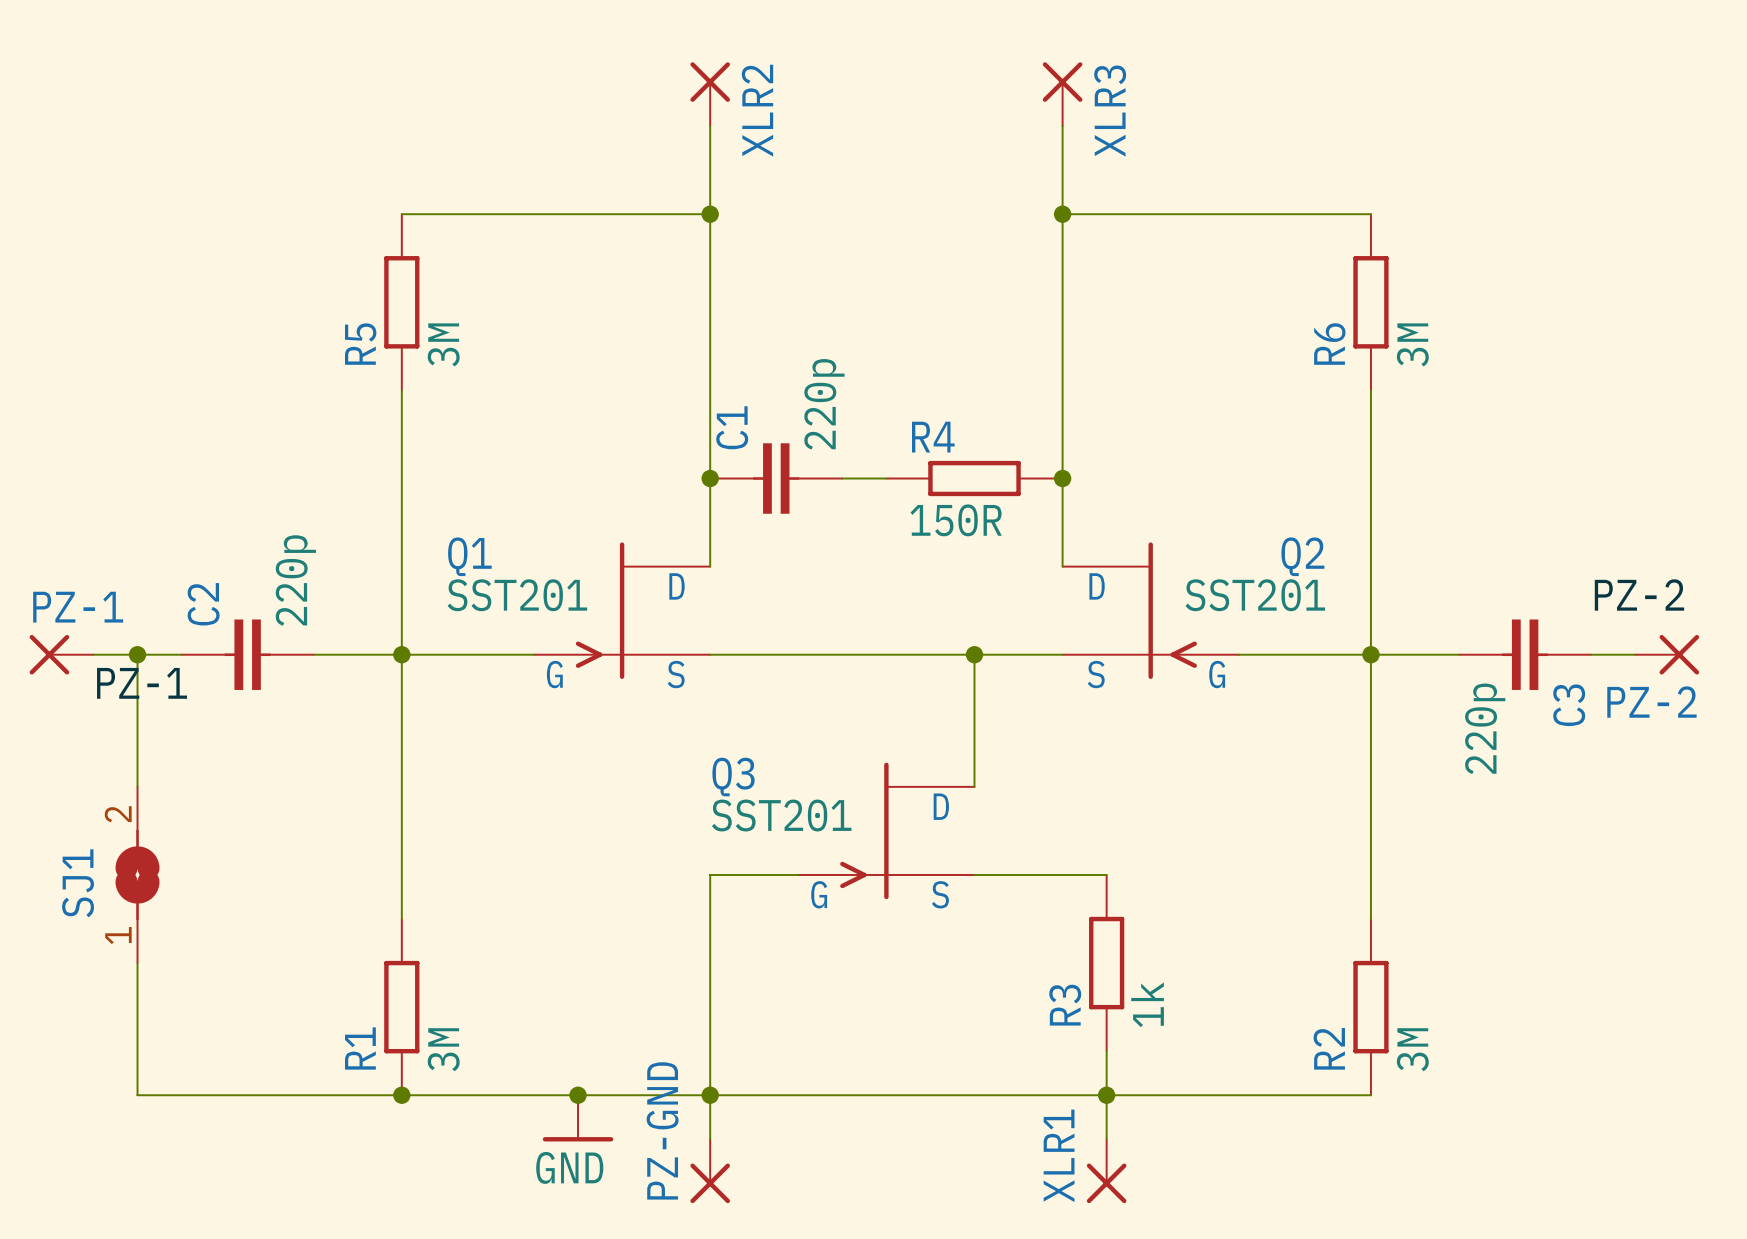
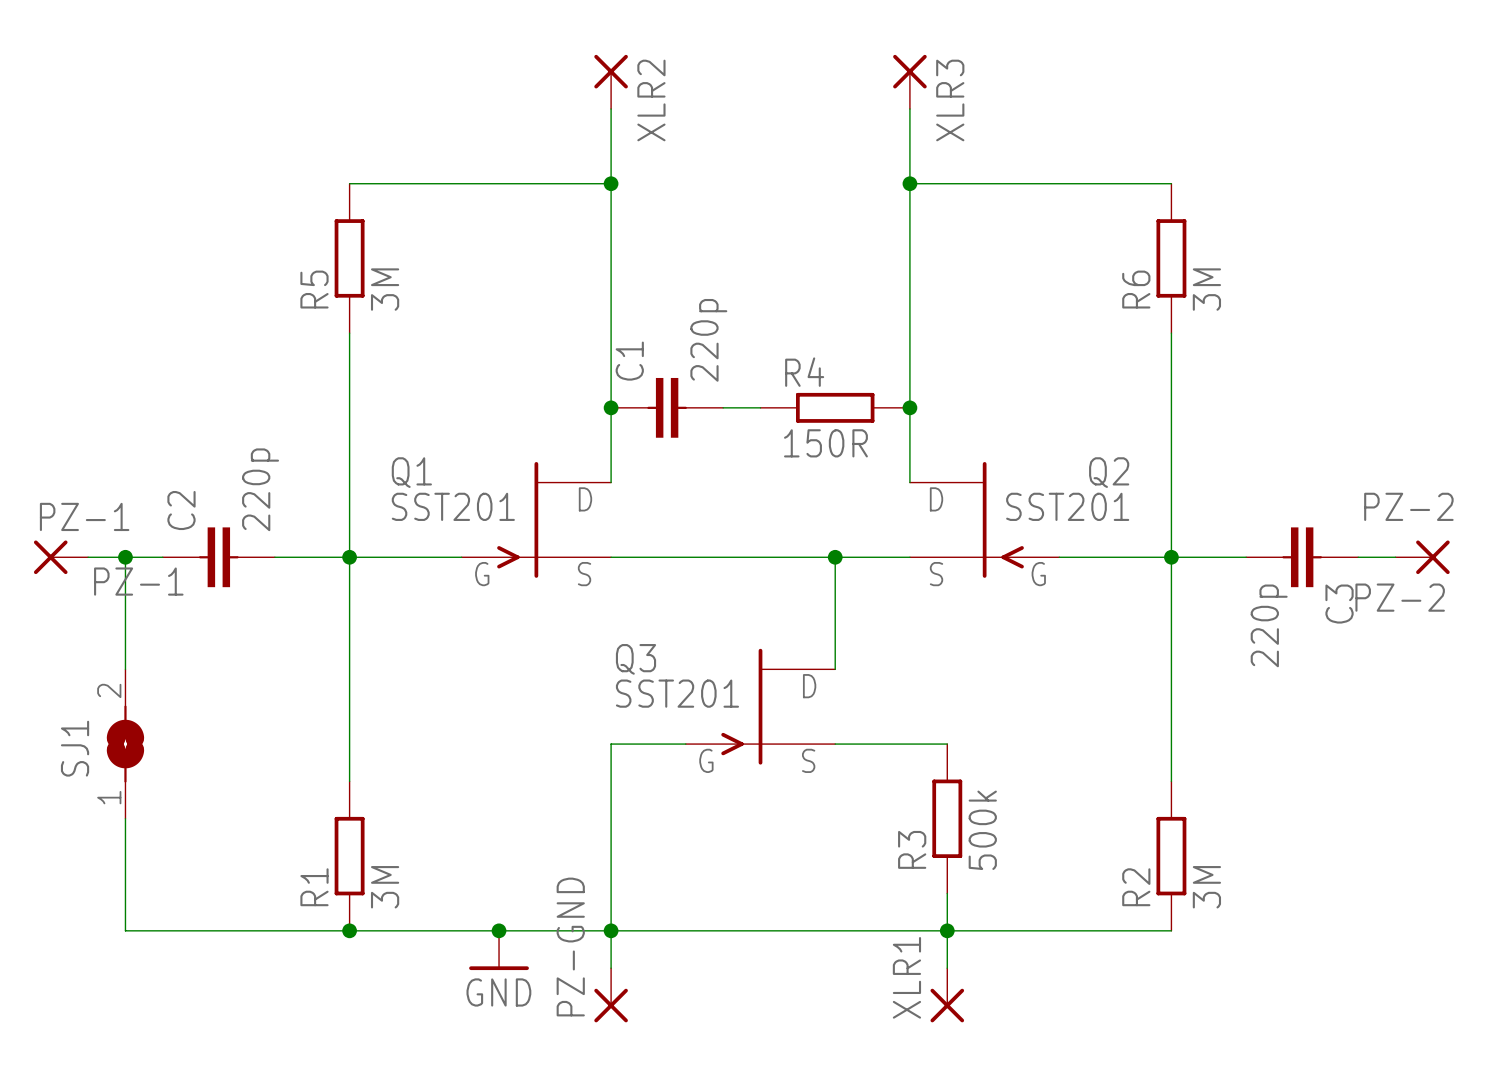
R3 value: 1k (1147, 1004) -> 500k (982, 830)

